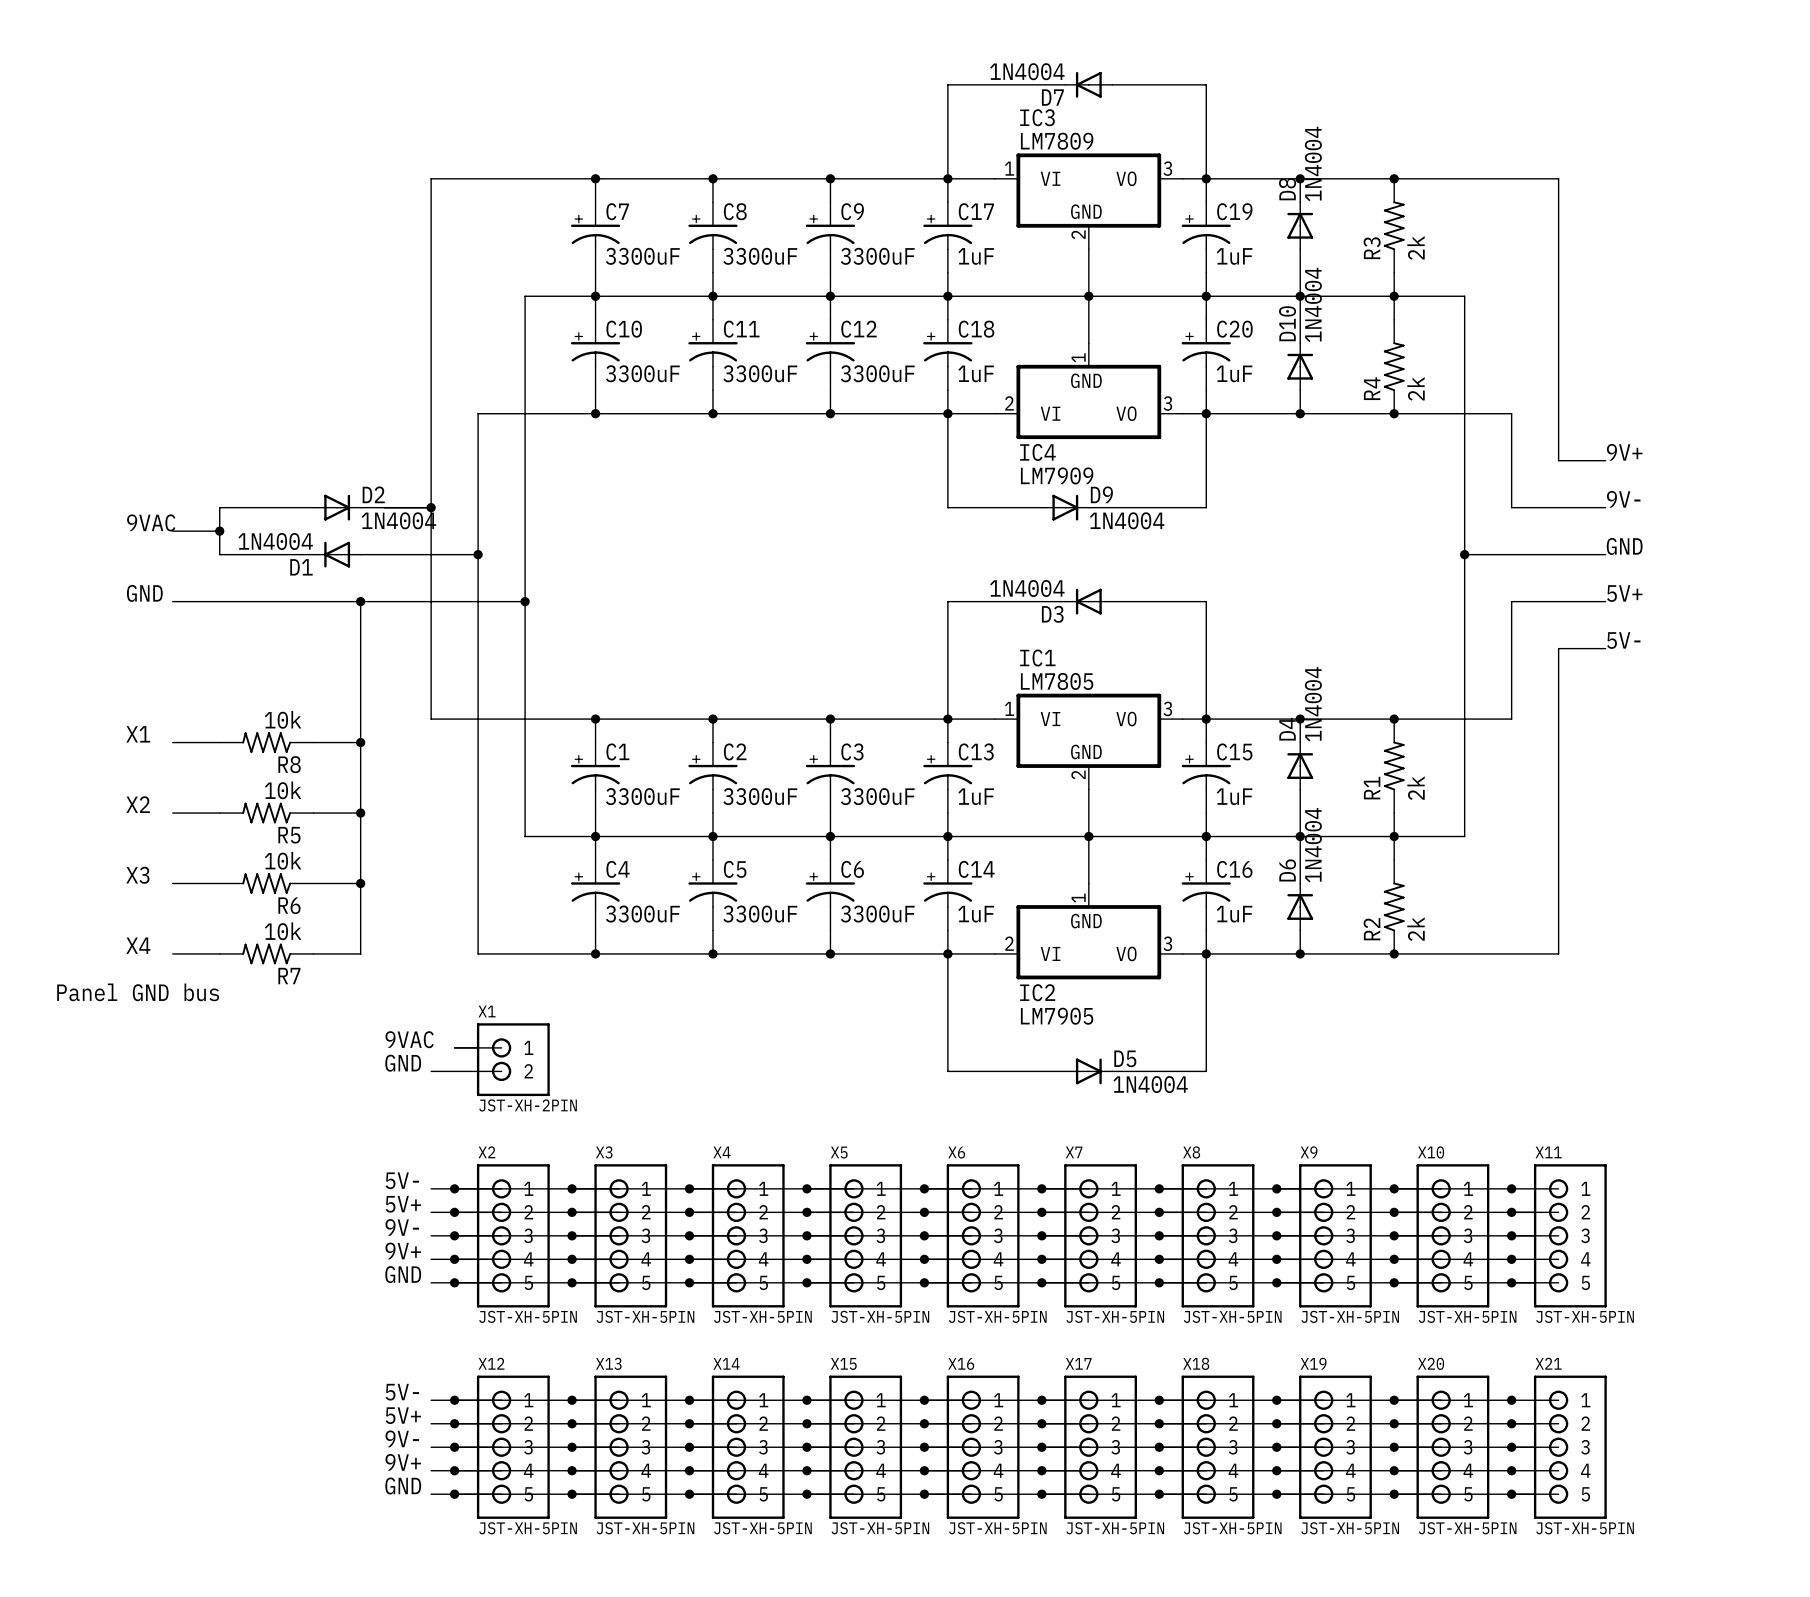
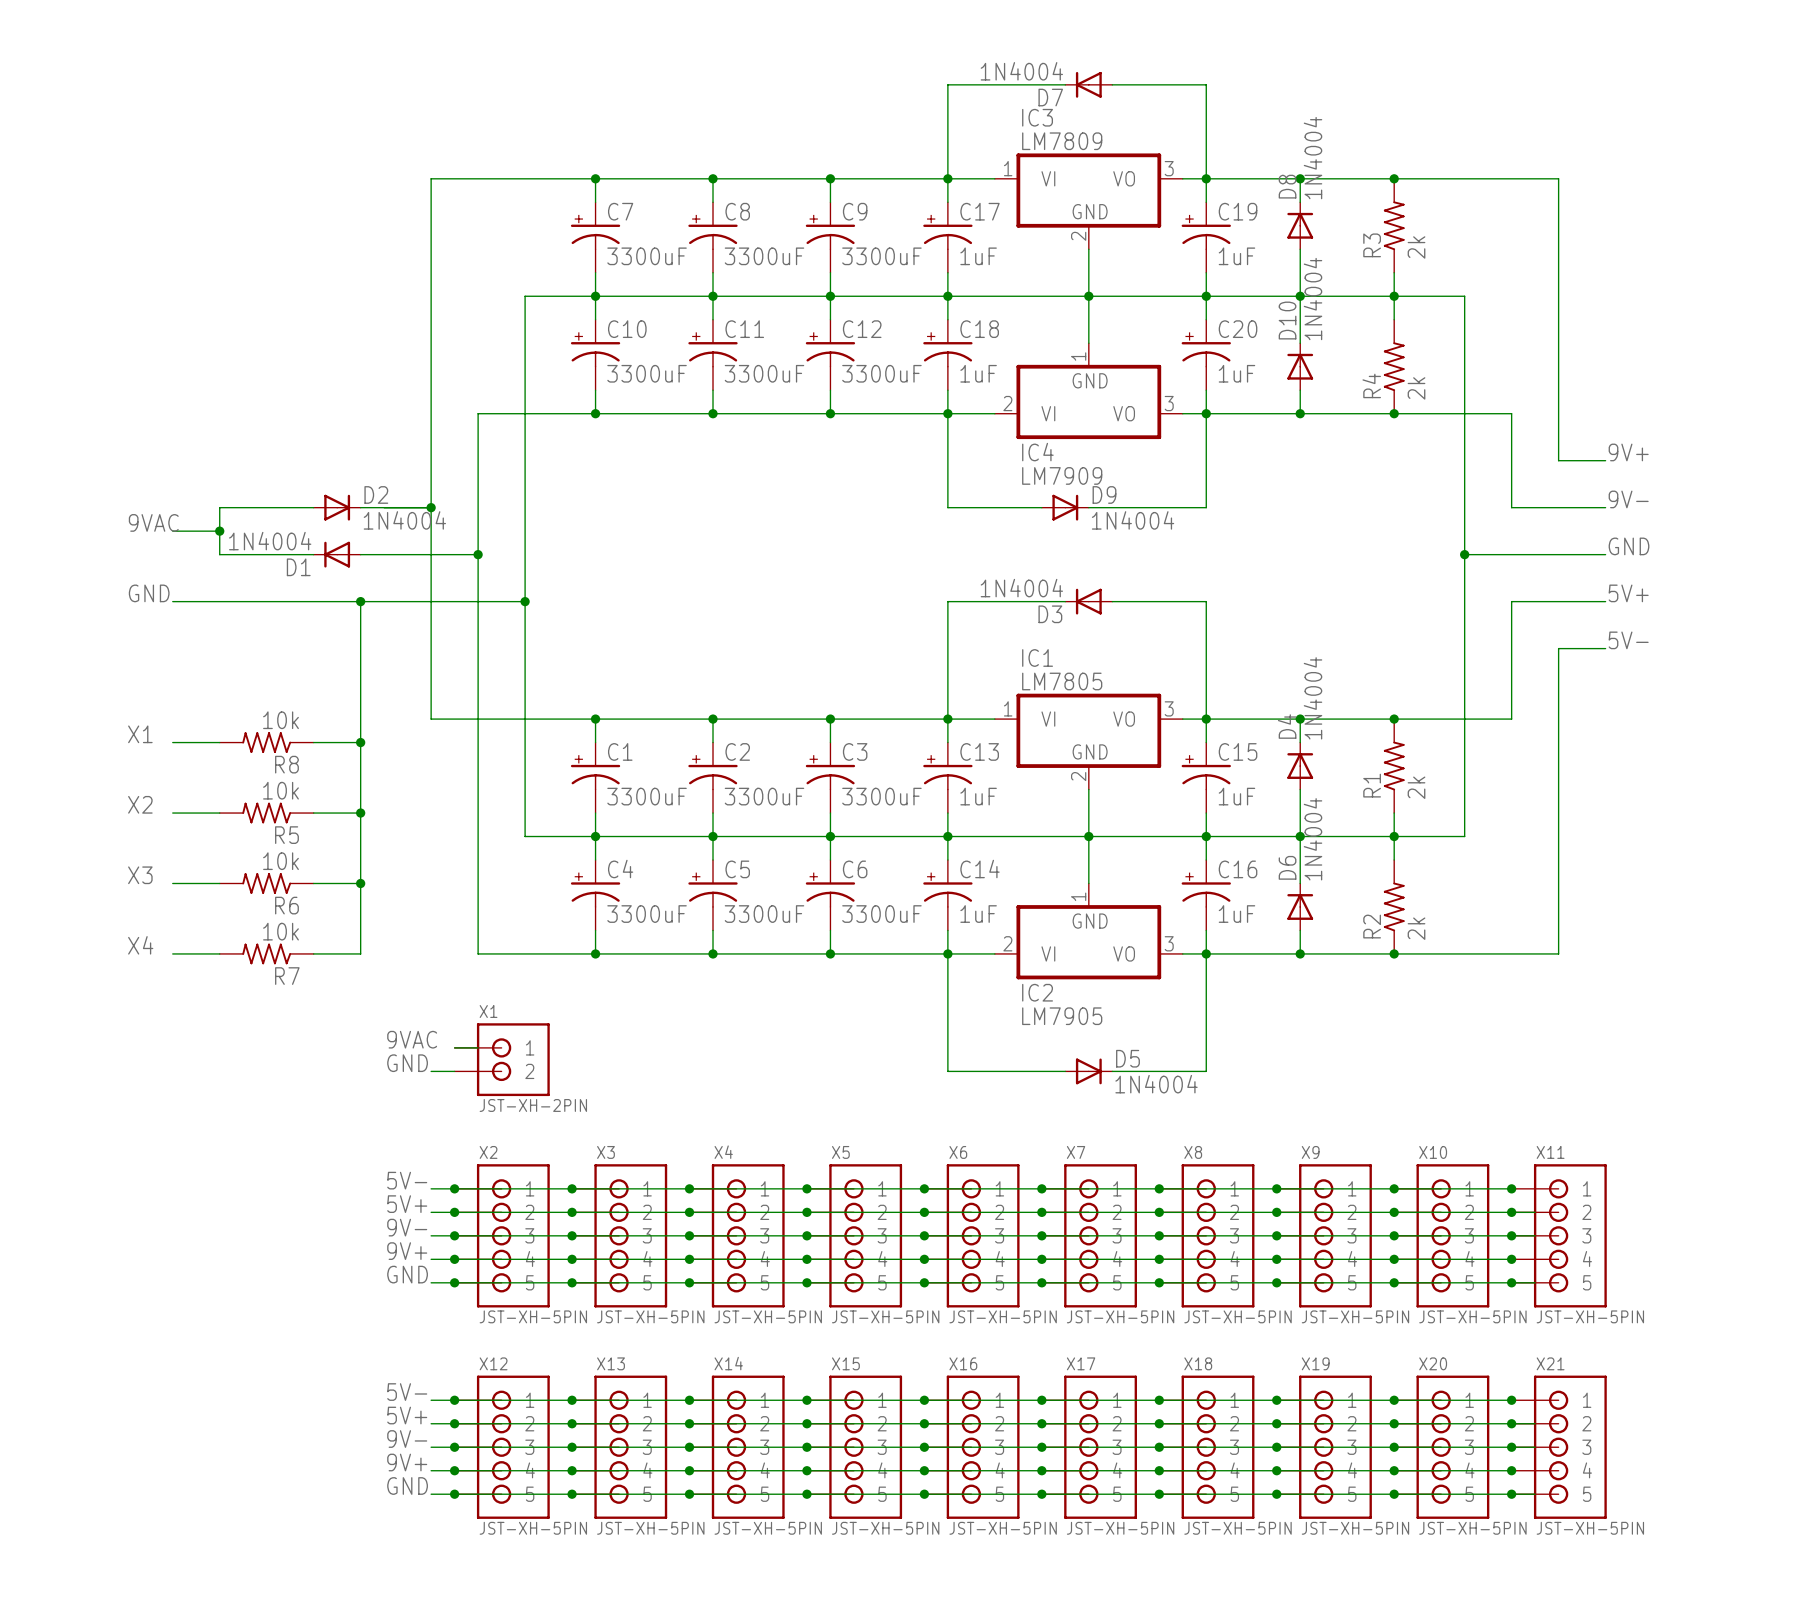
text: Panel GND bus (138, 992) -> none

